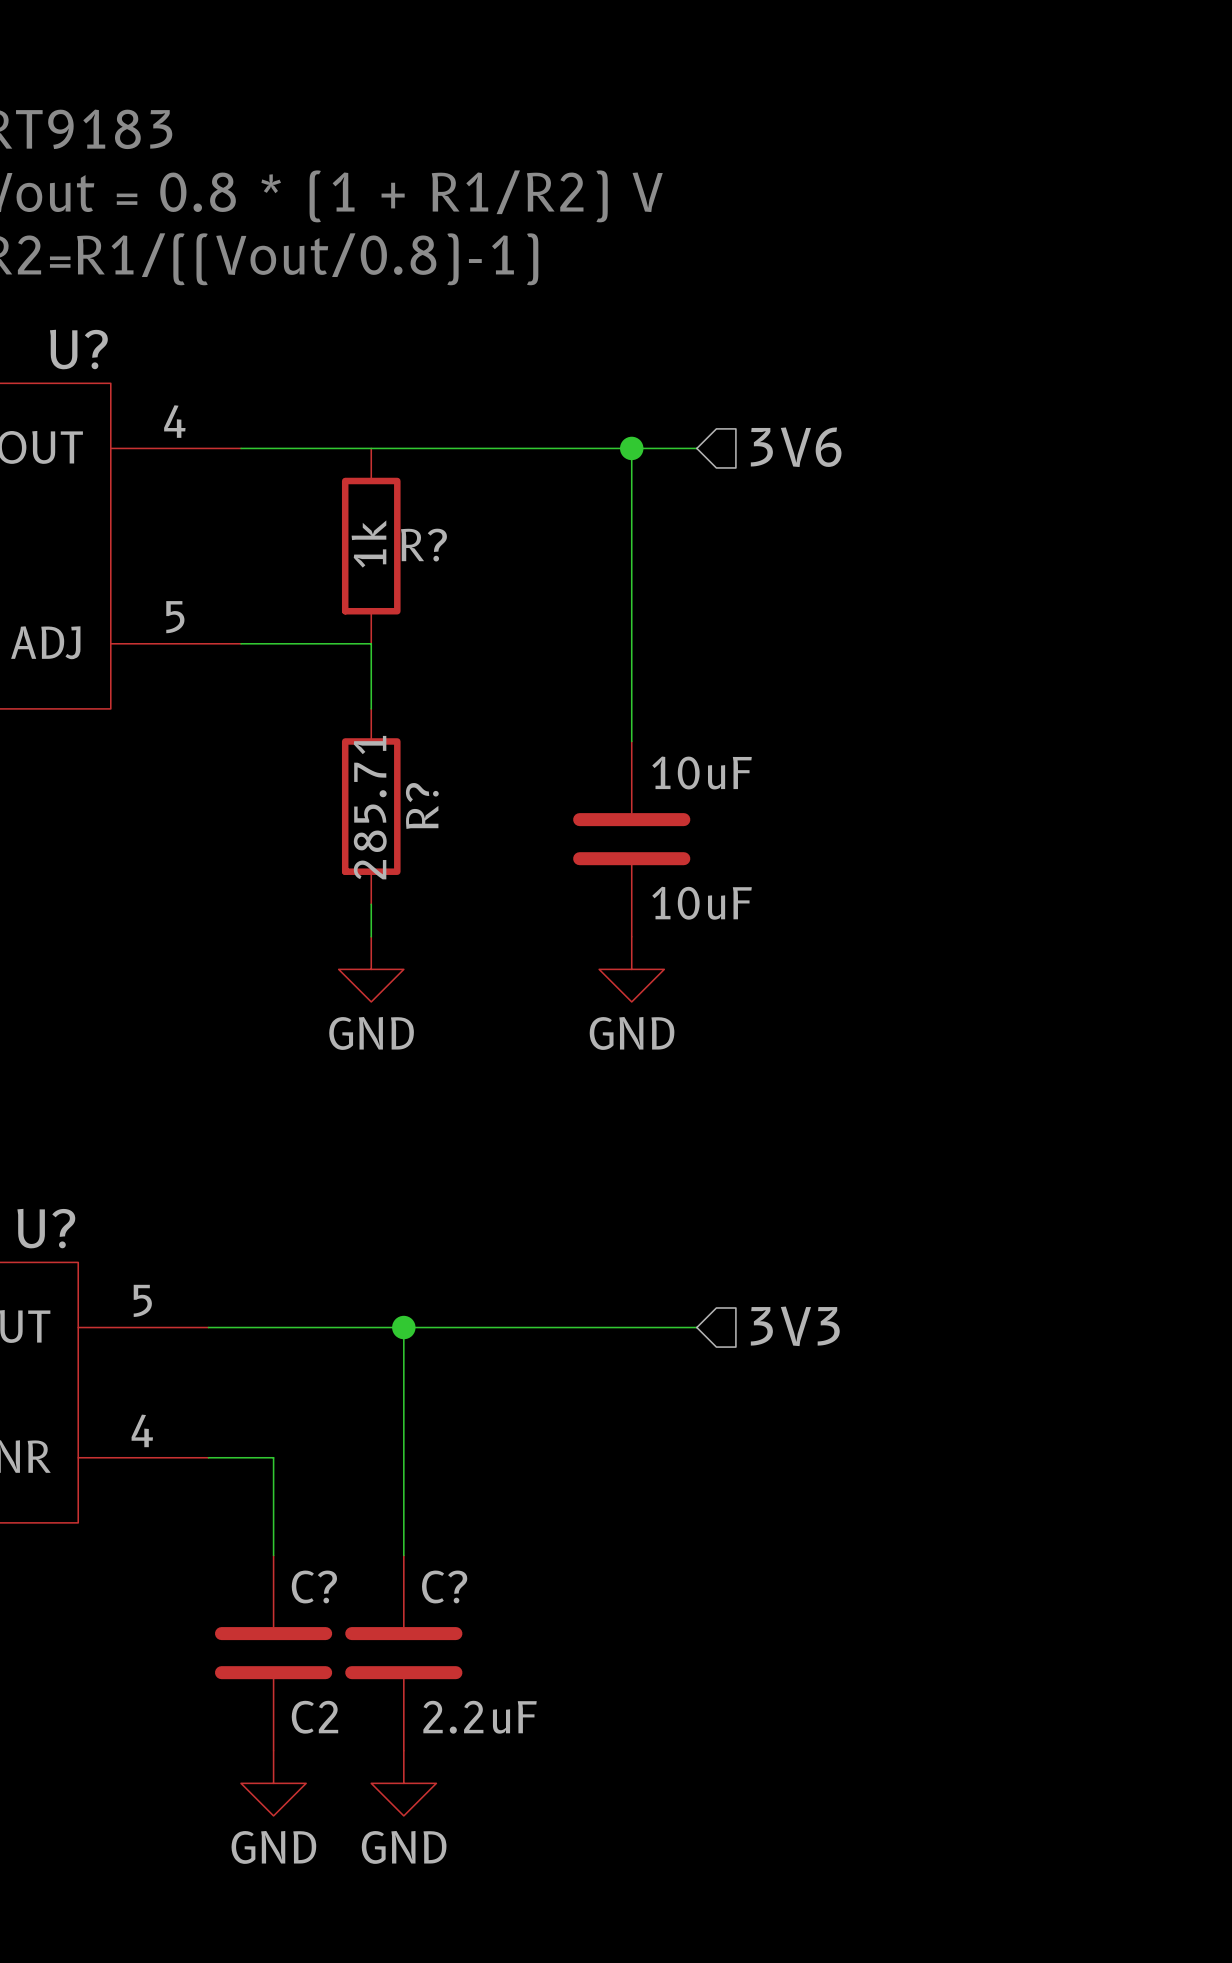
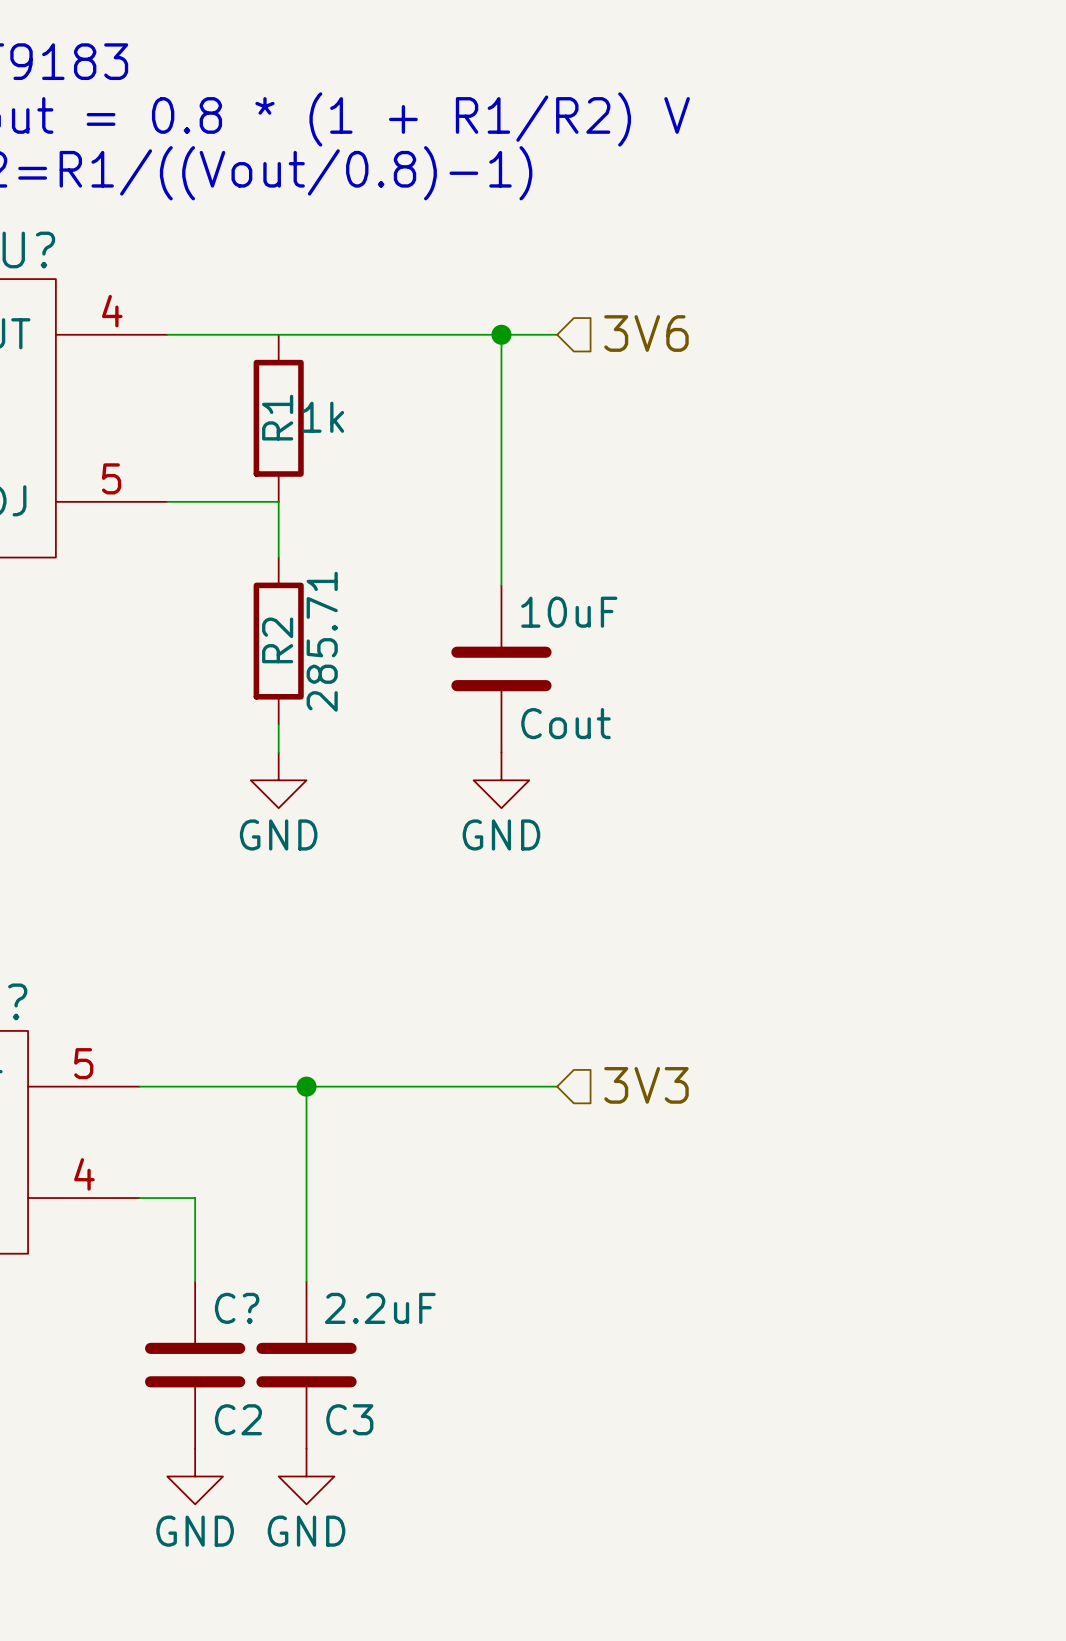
R? value: 1k (368, 544) -> R1 (277, 417)
R? name: R? (423, 545) -> 1k (323, 417)
R? name: R? (422, 805) -> 285.71 (322, 641)
R? value: 285.71 (370, 807) -> R2 (277, 640)
10uF value: 10uF (702, 903) -> Cout (565, 723)
C? name: C? (444, 1586) -> 2.2uF (380, 1308)
C? value: 2.2uF (480, 1717) -> C3 (349, 1419)

